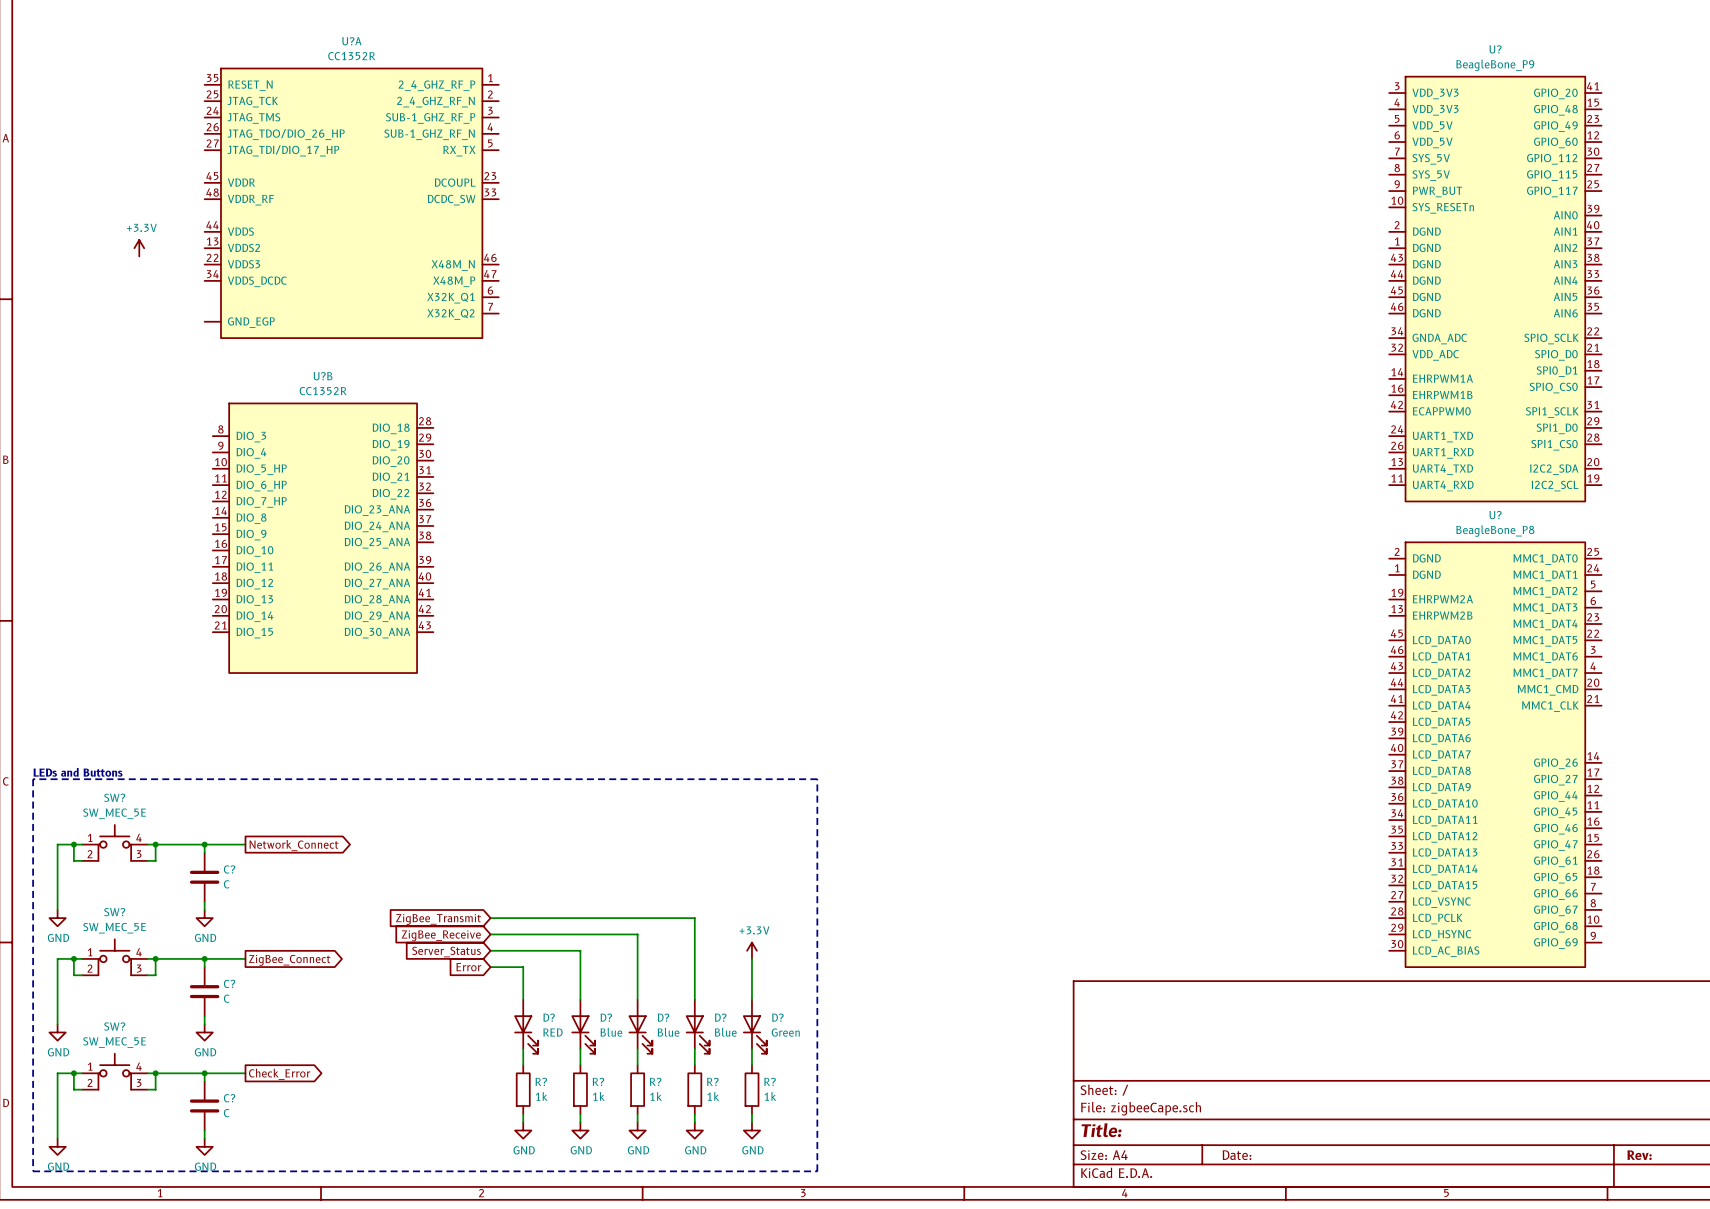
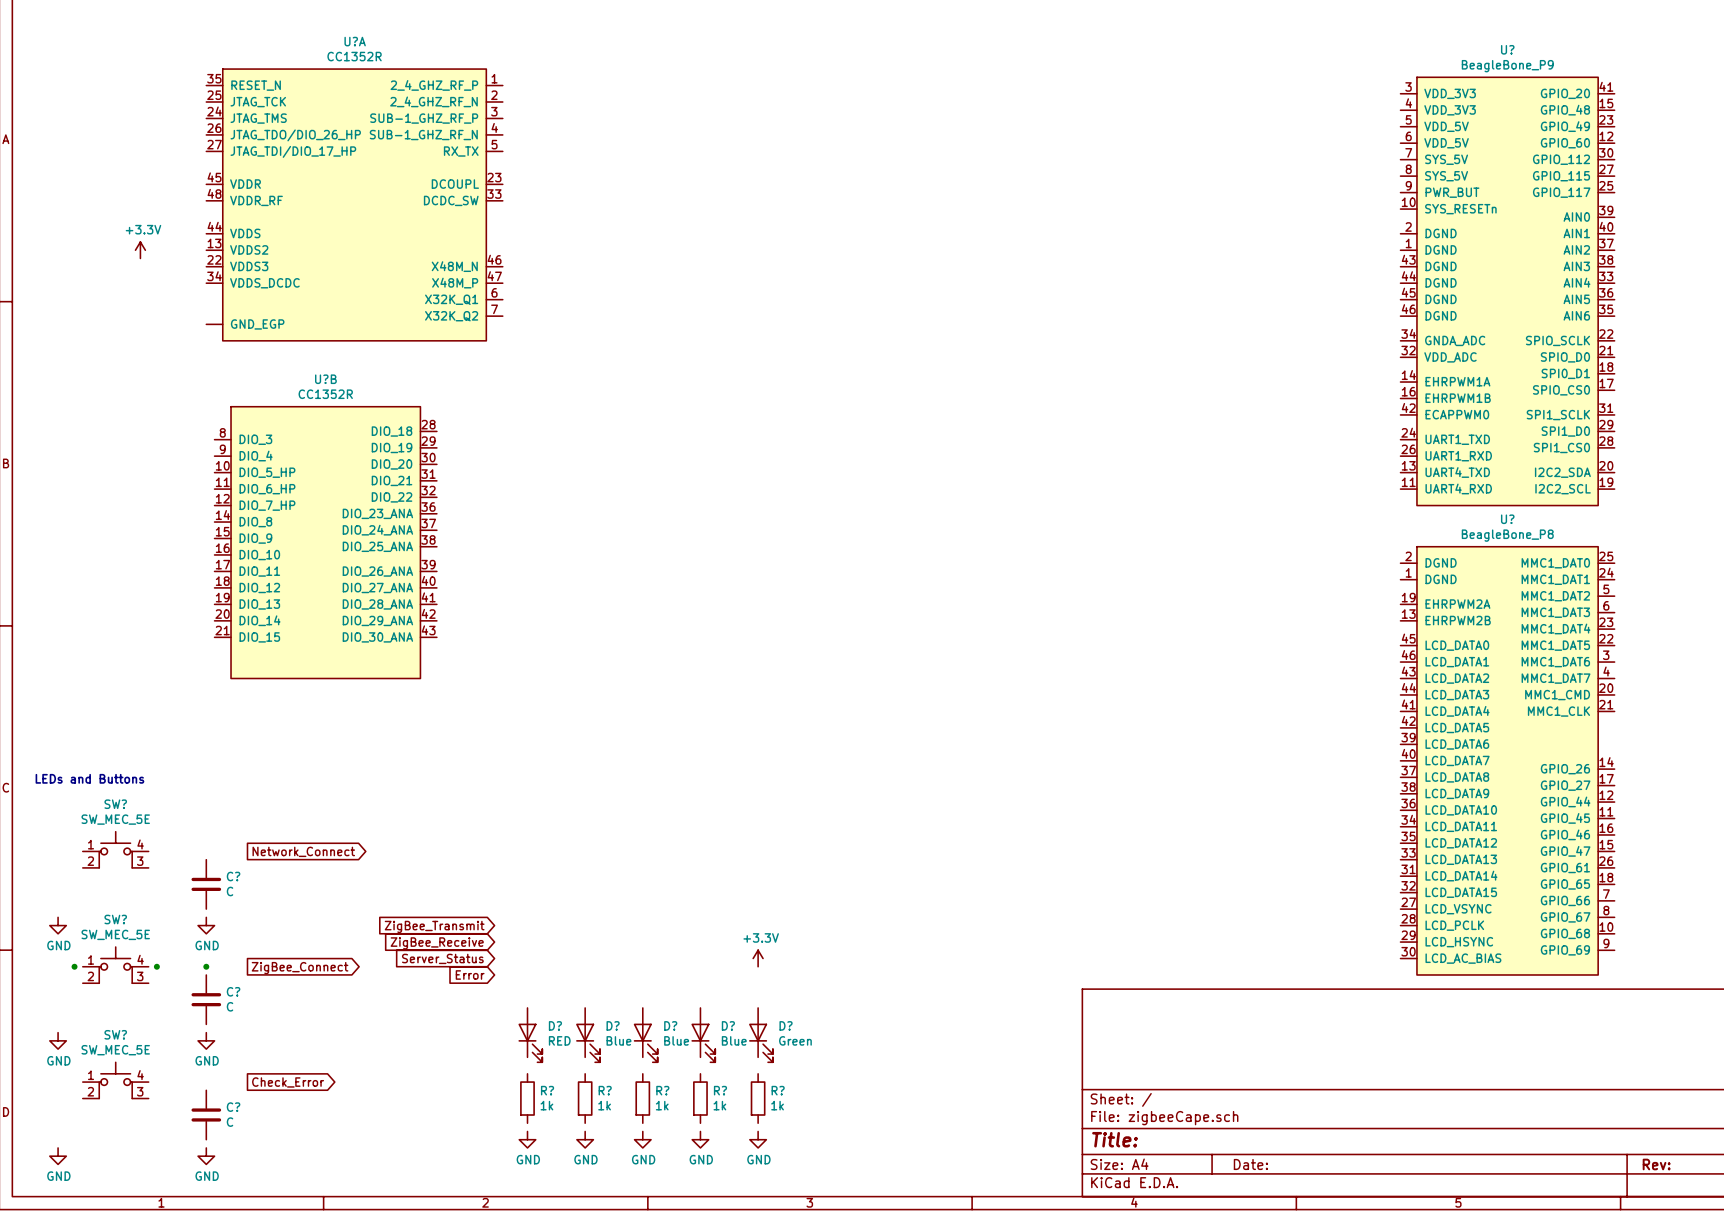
line: (33, 779) (33, 1171) (817, 1171) (817, 779) (33, 779) -> none
wire: (73, 844) (73, 860) (82, 860) -> none
junction: (73, 844) -> none
wire: (82, 844) (57, 844) (57, 909) -> none
wire: (147, 844) (245, 844) -> none
wire: (155, 844) (155, 860) (147, 860) -> none
junction: (155, 844) -> none
wire: (204, 844) (204, 852) -> none
junction: (204, 844) -> none
wire: (204, 901) (204, 909) -> none
wire: (490, 918) (694, 918) (694, 999) -> none
wire: (490, 934) (637, 934) (637, 999) -> none
wire: (490, 950) (580, 950) (580, 999) -> none
wire: (73, 958) (73, 975) (82, 975) -> none
wire: (82, 958) (57, 958) (57, 1024) -> none
wire: (147, 958) (245, 958) -> none
wire: (155, 958) (155, 975) (147, 975) -> none
wire: (204, 958) (204, 967) -> none
wire: (751, 958) (751, 999) -> none
wire: (490, 967) (523, 967) (523, 999) -> none
wire: (204, 1016) (204, 1024) -> none
wire: (523, 1048) (523, 1065) -> none
wire: (580, 1048) (580, 1065) -> none
wire: (637, 1048) (637, 1065) -> none
wire: (694, 1048) (694, 1065) -> none
wire: (751, 1048) (751, 1065) -> none
wire: (73, 1073) (73, 1089) (82, 1089) -> none
junction: (73, 1073) -> none
wire: (82, 1073) (57, 1073) (57, 1138) -> none
wire: (147, 1073) (245, 1073) -> none
wire: (155, 1073) (155, 1089) (147, 1089) -> none
junction: (155, 1073) -> none
wire: (204, 1073) (204, 1081) -> none
junction: (204, 1073) -> none
wire: (523, 1114) (523, 1122) -> none
wire: (580, 1114) (580, 1122) -> none
wire: (637, 1114) (637, 1122) -> none
wire: (694, 1114) (694, 1122) -> none
wire: (751, 1114) (751, 1122) -> none
wire: (204, 1130) (204, 1138) -> none

